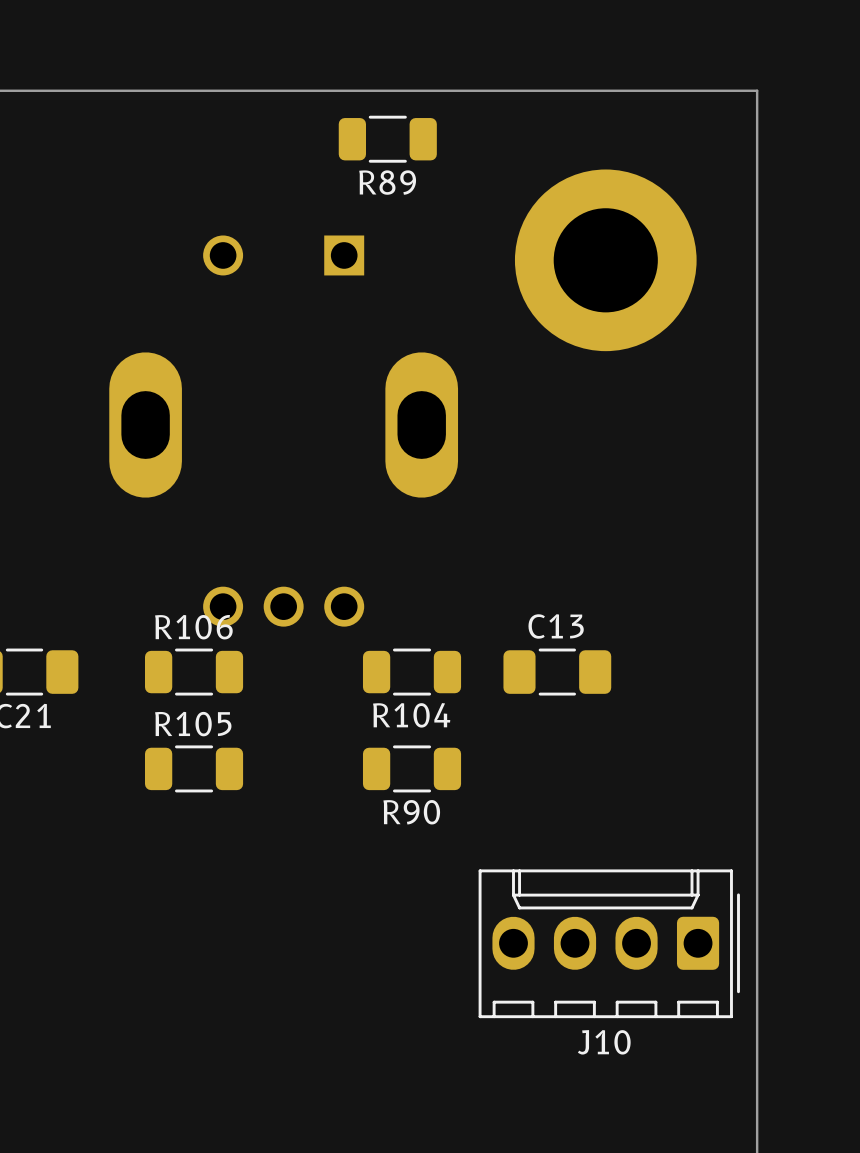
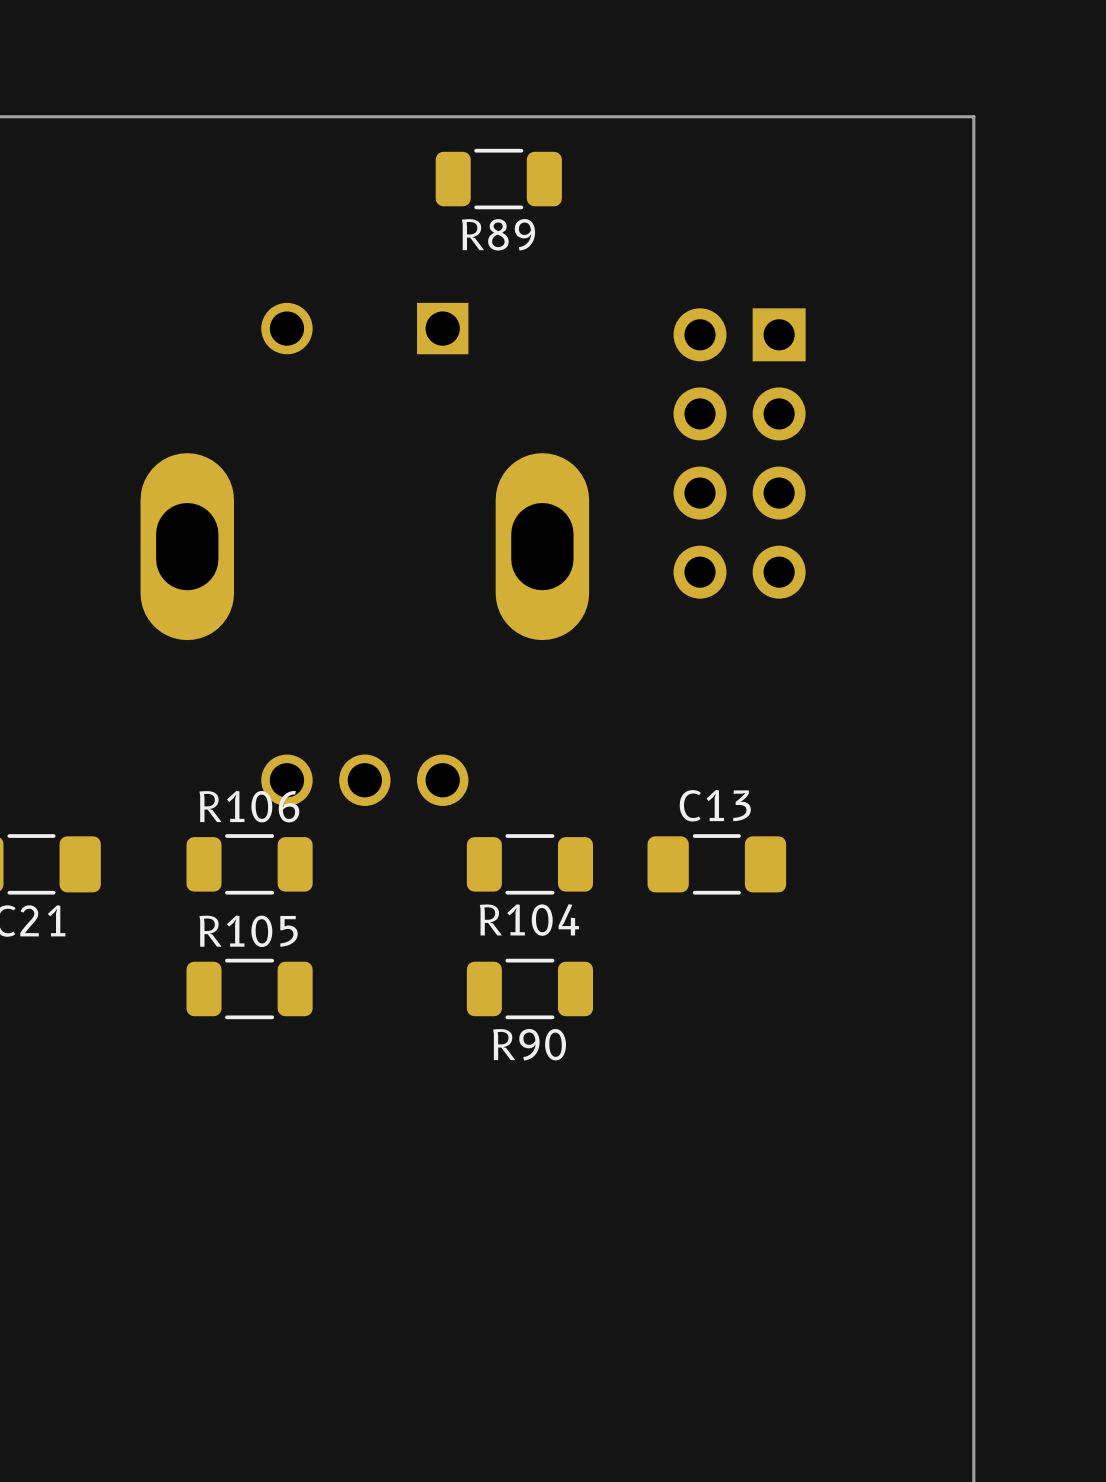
part: (605, 260) -> none
part: none -> (739, 453)
J10: (609, 943) -> none

